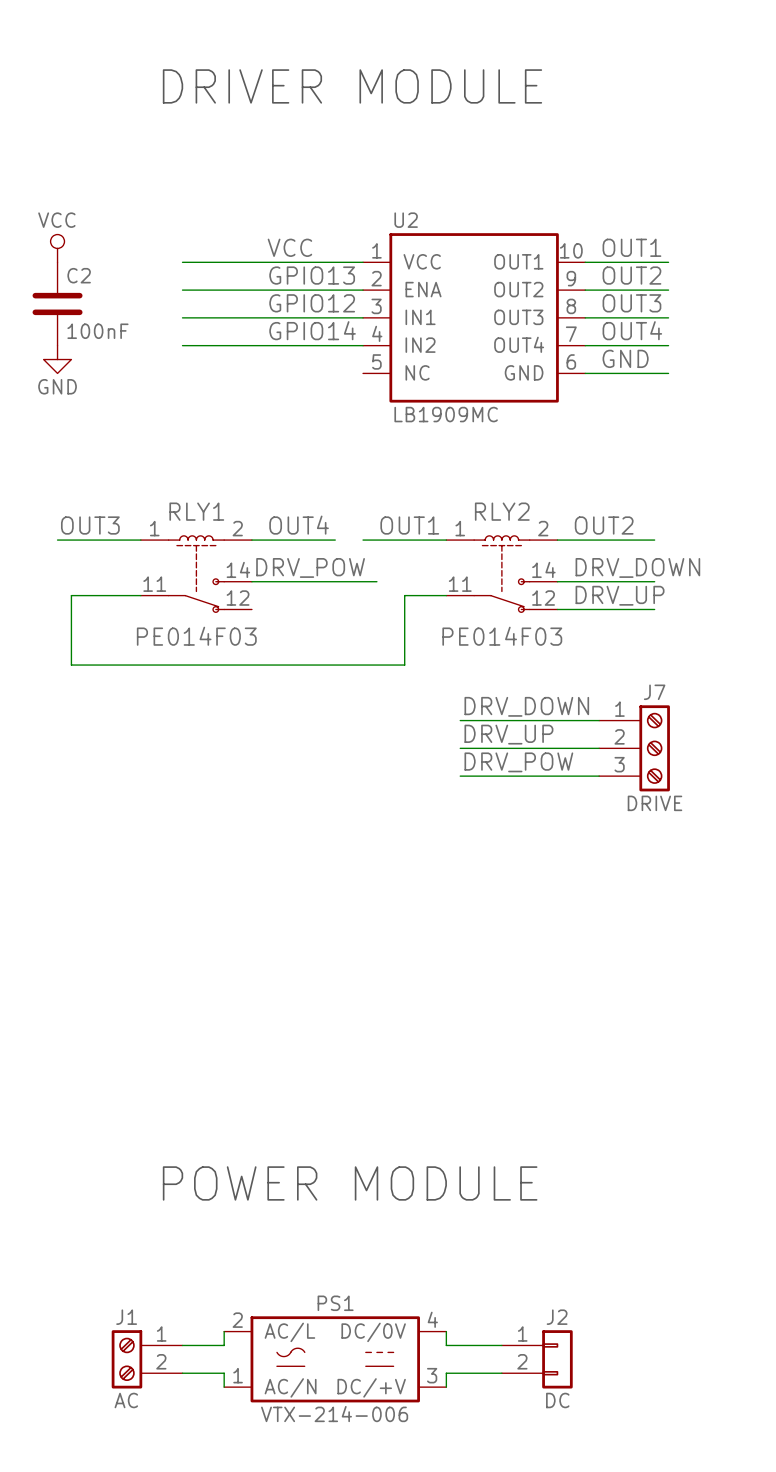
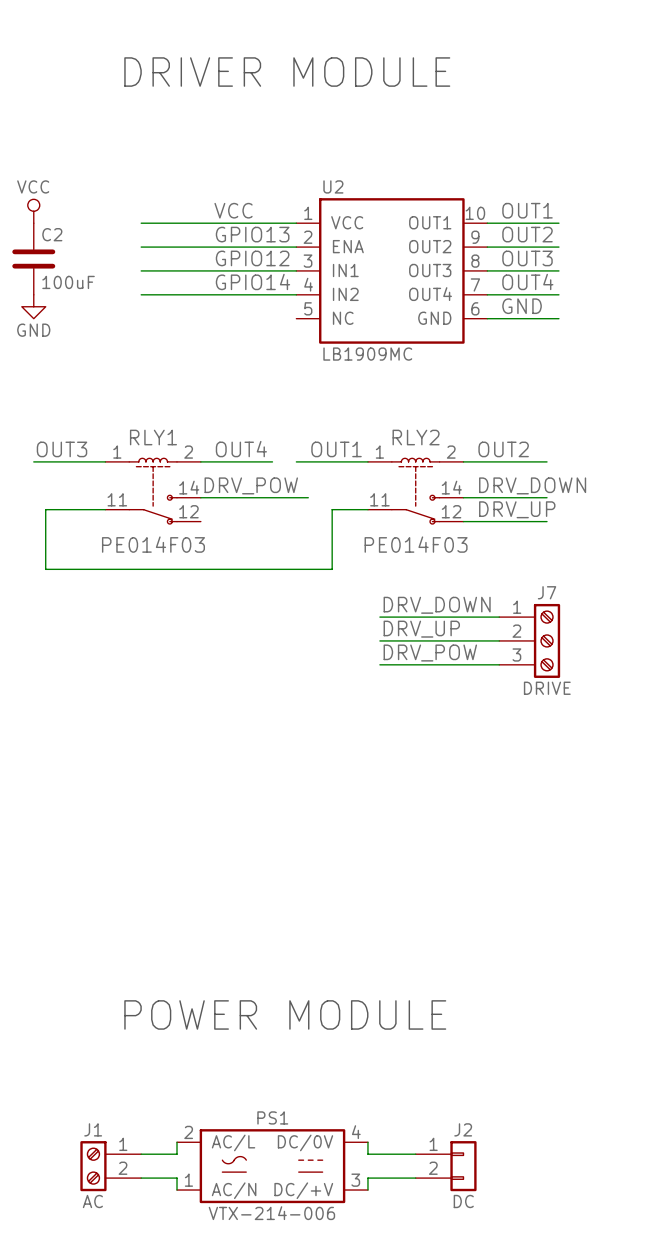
C2 value: 100nF (97, 331) -> 100uF (68, 282)

